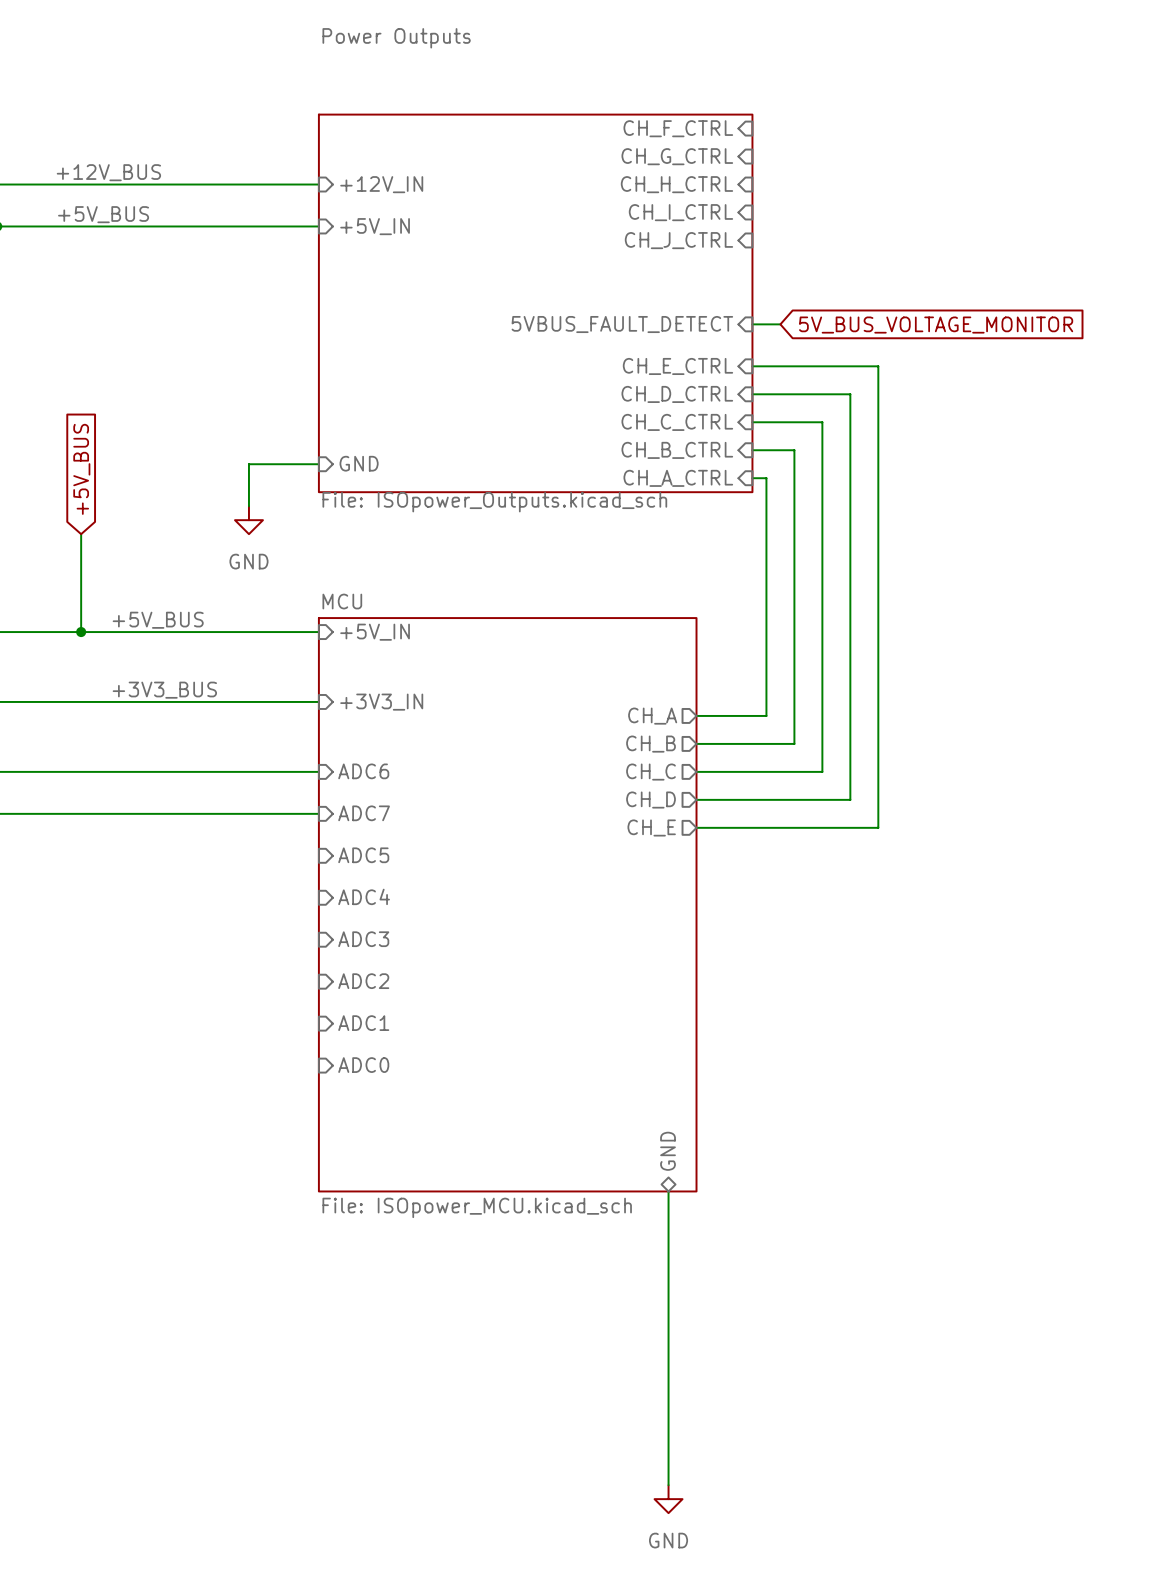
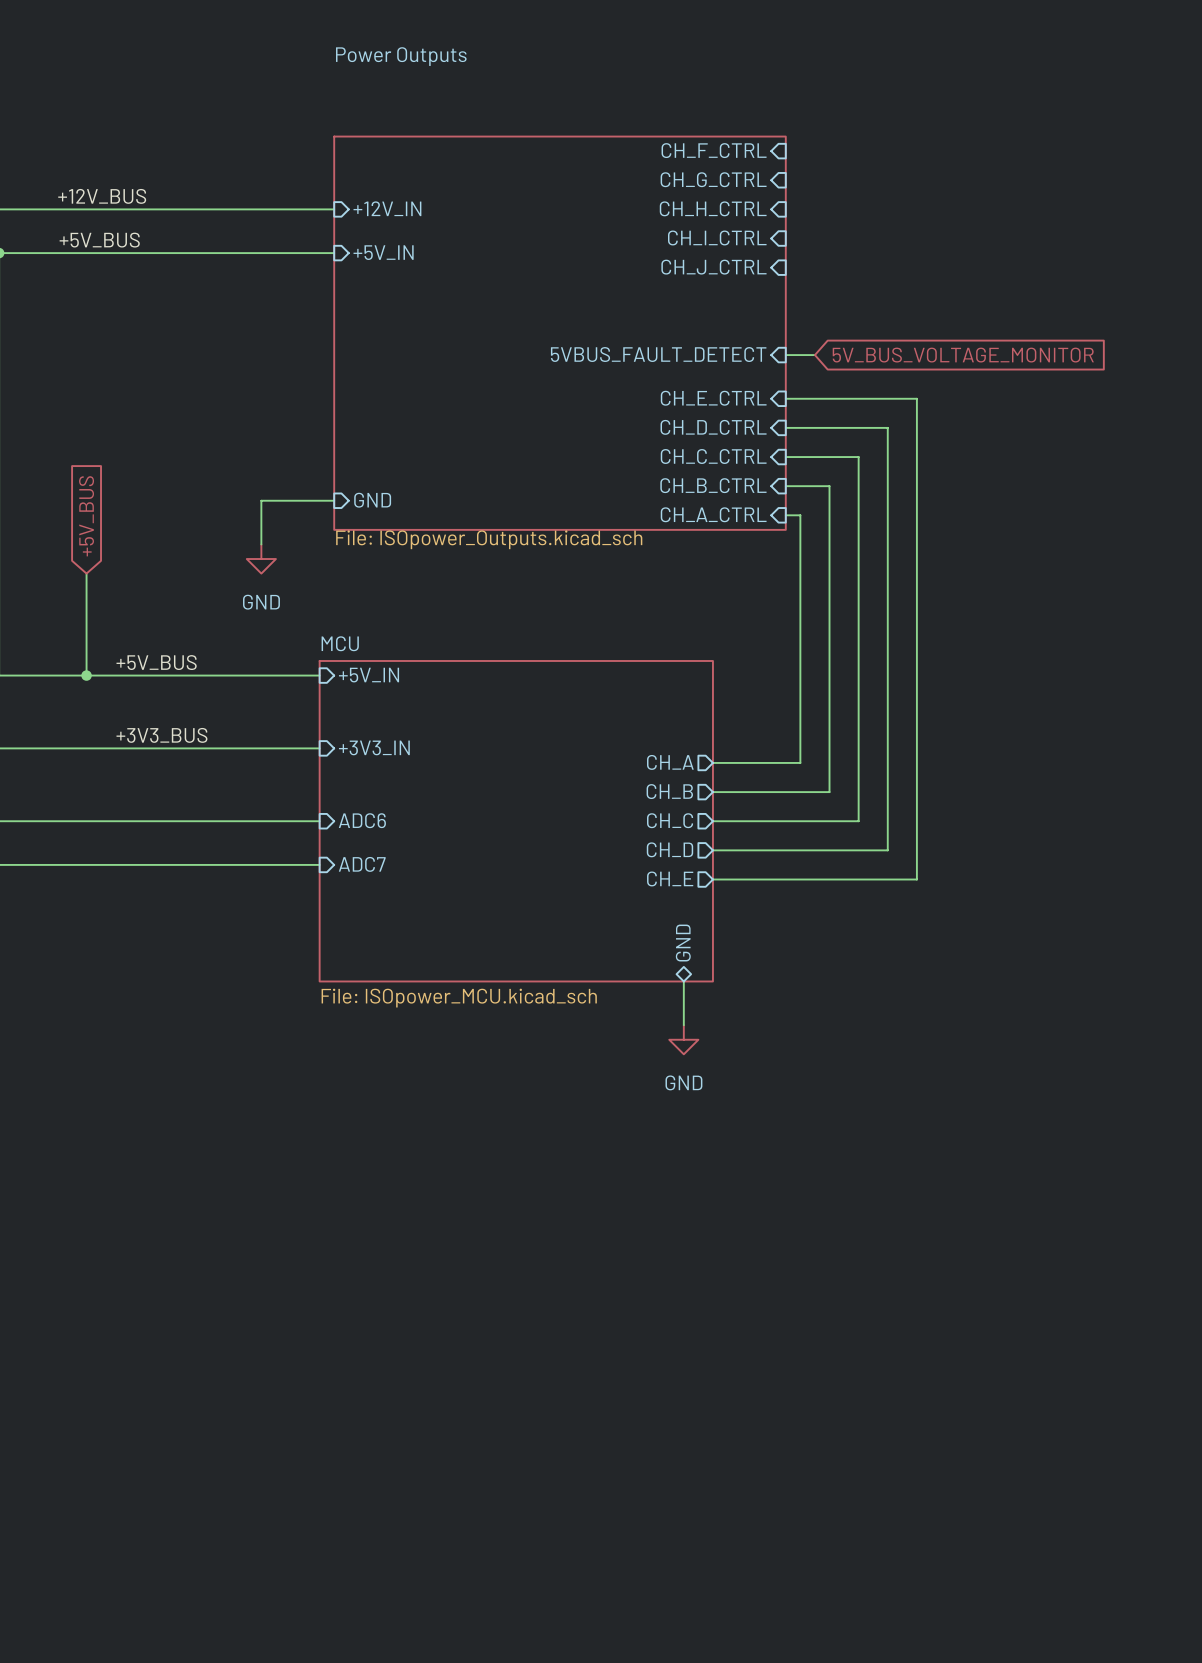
wire: (304, 632) (318, 632) -> none
sheet pin position: +5V_IN (375, 632) -> +5V_IN (369, 675)
wire: (304, 701) (318, 701) -> none
sheet pin position: +3V3_IN (381, 702) -> +3V3_IN (374, 747)
wire: none -> (712, 762) (727, 762)
sheet pin position: CH_A (652, 716) -> CH_A (670, 762)
wire: none -> (712, 792) (727, 792)
sheet pin position: CH_B (651, 744) -> CH_B (669, 791)
wire: (304, 771) (318, 771) -> none
sheet pin position: ADC6 (363, 771) -> ADC6 (362, 820)
sheet MCU: none -> File: ISOpower_MCU.kicad_sch (516, 821)
wire: none -> (712, 821) (727, 821)
sheet pin position: CH_C (651, 772) -> CH_C (670, 820)
wire: none -> (712, 850) (727, 850)
sheet pin position: CH_D (651, 800) -> CH_D (669, 849)
wire: (304, 813) (318, 813) -> none
sheet pin position: ADC7 (364, 813) -> ADC7 (362, 864)
sheet pin position: CH_E (651, 827) -> CH_E (670, 878)
wire: none -> (712, 879) (727, 879)
sheet pin: ADC5 (363, 855) -> none
sheet pin: ADC4 (364, 896) -> none
sheet MCU: File: ISOpower_MCU.kicad_sch (507, 904) -> none
wire: none -> (683, 981) (683, 1025)
sheet pin: ADC3 (363, 939) -> none
sheet pin: ADC2 (363, 981) -> none
power symbol: none -> GND (683, 1039)
sheet pin: ADC1 (363, 1023) -> none
sheet pin: ADC0 (363, 1065) -> none
sheet pin position: GND (668, 1151) -> GND (683, 943)
wire: (668, 1191) (668, 1485) -> none
power symbol: GND (668, 1499) -> none

